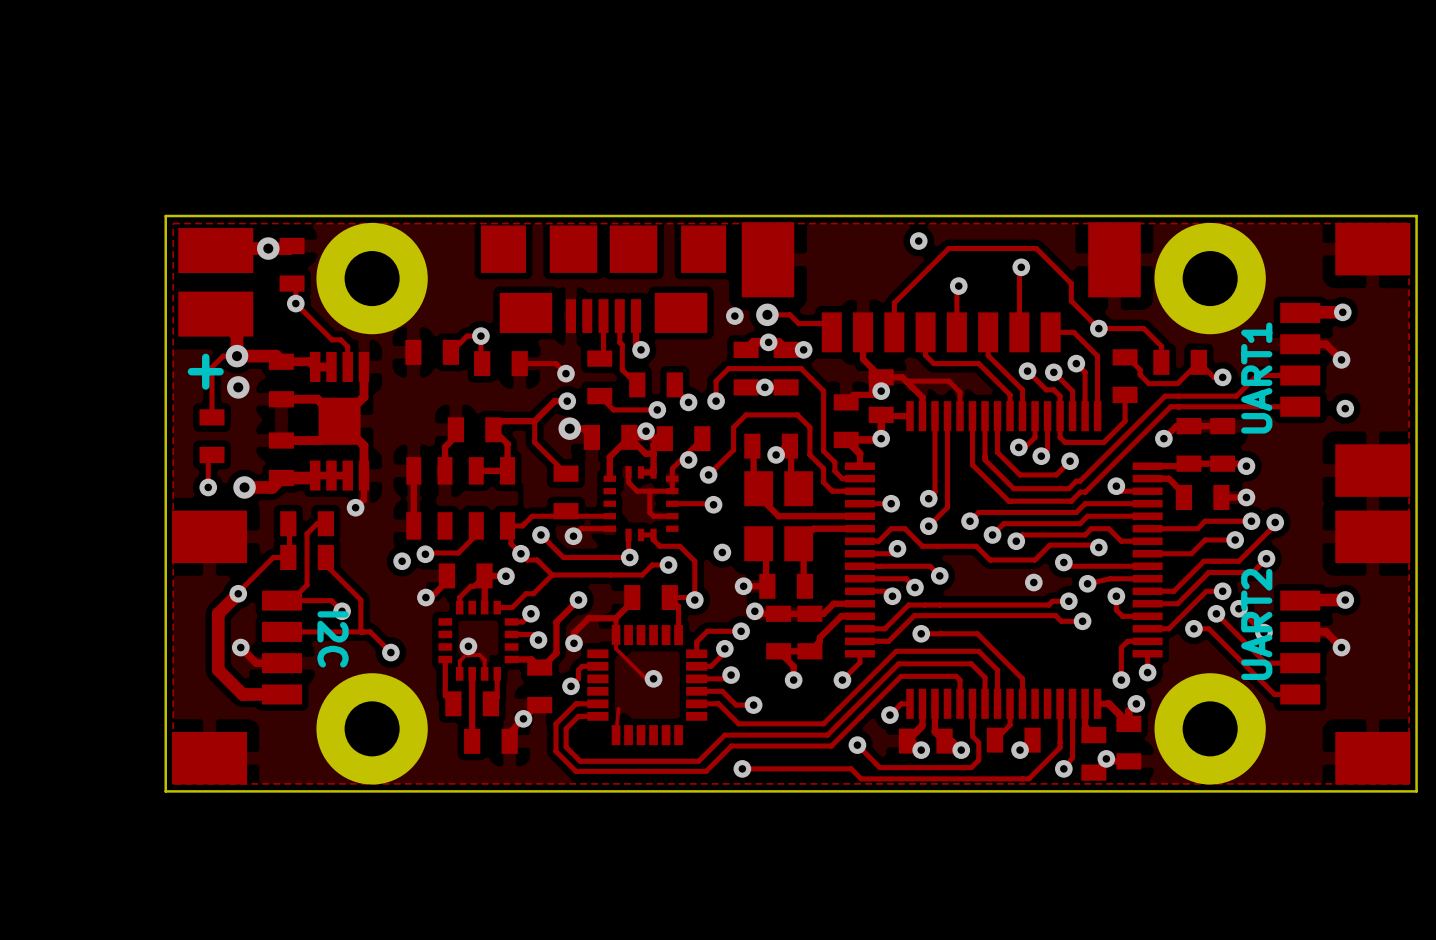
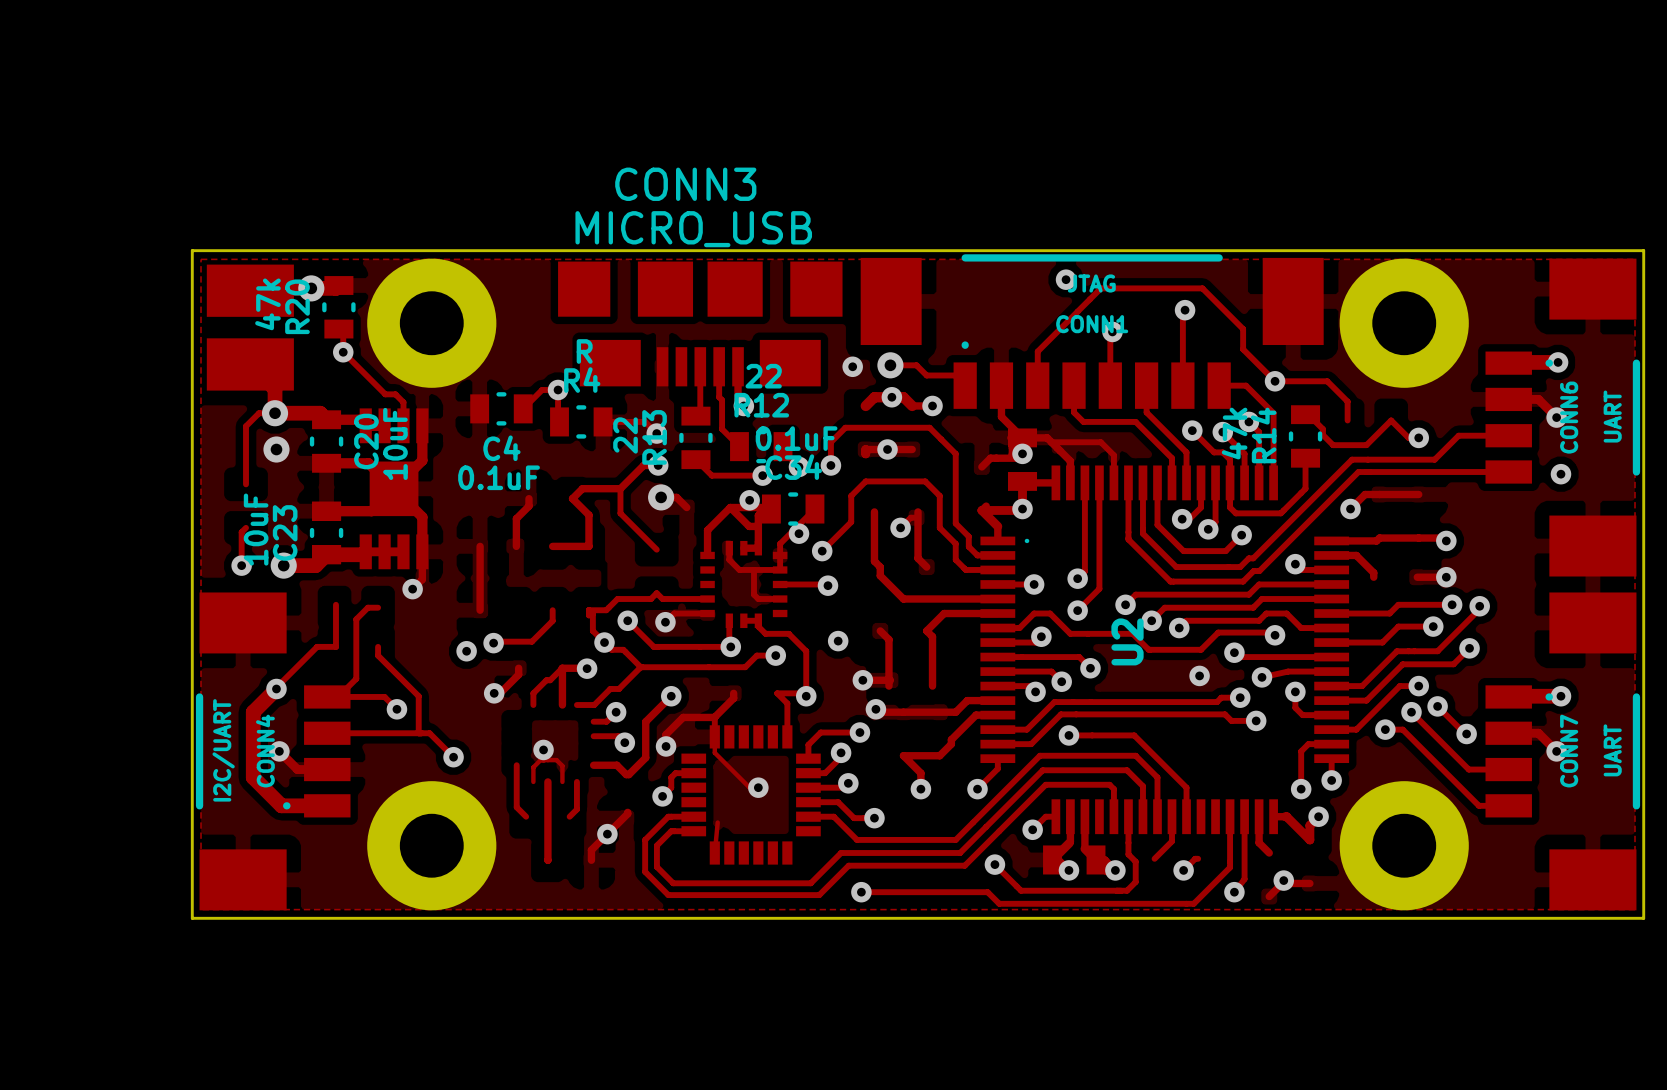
CONN3 name: none -> CONN3 (685, 184)
CONN3 value: none -> MICRO_USB (693, 229)
R20: none -> 47k (338, 307)
CONN1: none -> JTAG (1092, 331)
part: (941, 287) -> none
C4: none -> 0.1uF (501, 408)
CONN6: none -> UART (1562, 417)
part: (1180, 362) -> none
part: (500, 363) -> none
R4: none -> R (581, 421)
part: (746, 368) -> none
part: (786, 368) -> none
text: + (205, 371) -> none
R14: none -> 47k (1305, 436)
R13: none -> 22 (695, 437)
text: UART1 (1256, 378) -> none
C20: none -> 10uF (326, 441)
part: (656, 384) -> none
R12: none -> 22 (761, 446)
part: (846, 421) -> none
part: (474, 429) -> none
part: (212, 436) -> none
part: (610, 437) -> none
C34: none -> 0.1uF (793, 509)
part: (1188, 444) -> none
part: (1222, 444) -> none
part: (771, 446) -> none
C23: none -> 10uF (326, 532)
part: (565, 492) -> none
part: (1202, 497) -> none
part: (460, 498) -> none
part: (778, 516) -> none
part: (307, 523) -> none
part: (307, 557) -> none
part: (1003, 560) -> none
U2: none -> (1164, 649)
part: (465, 575) -> none
part: (786, 586) -> none
part: (651, 597) -> none
text: UART2 (1256, 624) -> none
part: (778, 632) -> none
part: (809, 632) -> none
text: I2C (333, 639) -> none
part: (478, 640) -> none
CONN4: none -> I2C/UART (273, 751)
CONN7: none -> UART (1562, 751)
part: (539, 686) -> none
part: (472, 703) -> none
part: (1013, 740) -> none
part: (490, 741) -> none
part: (1128, 742) -> none
part: (1093, 753) -> none

